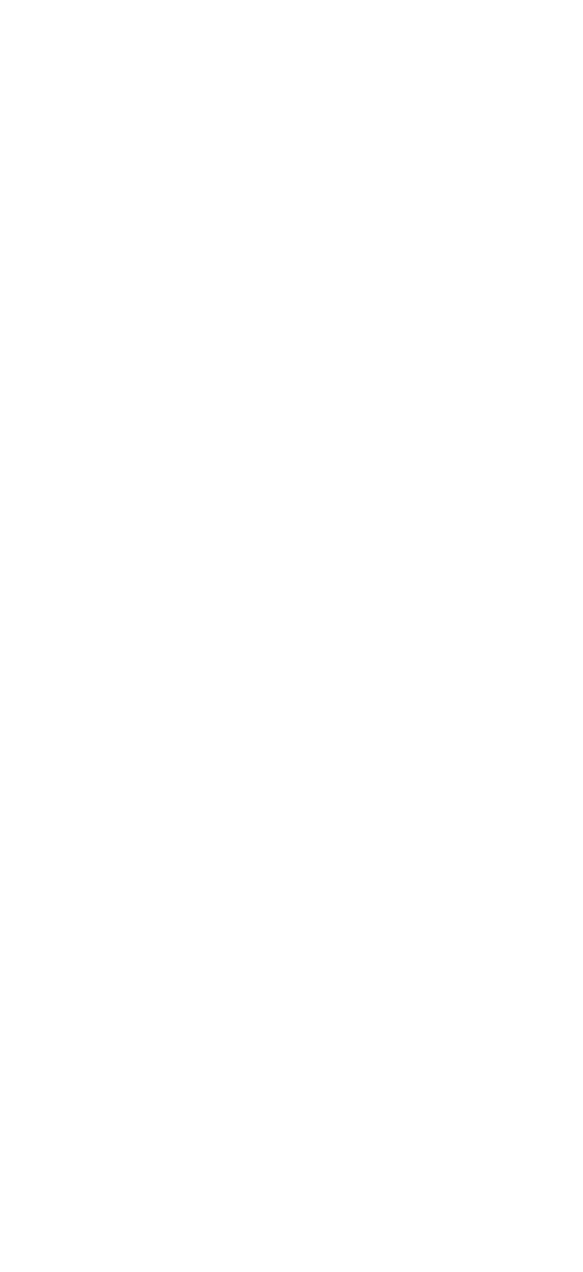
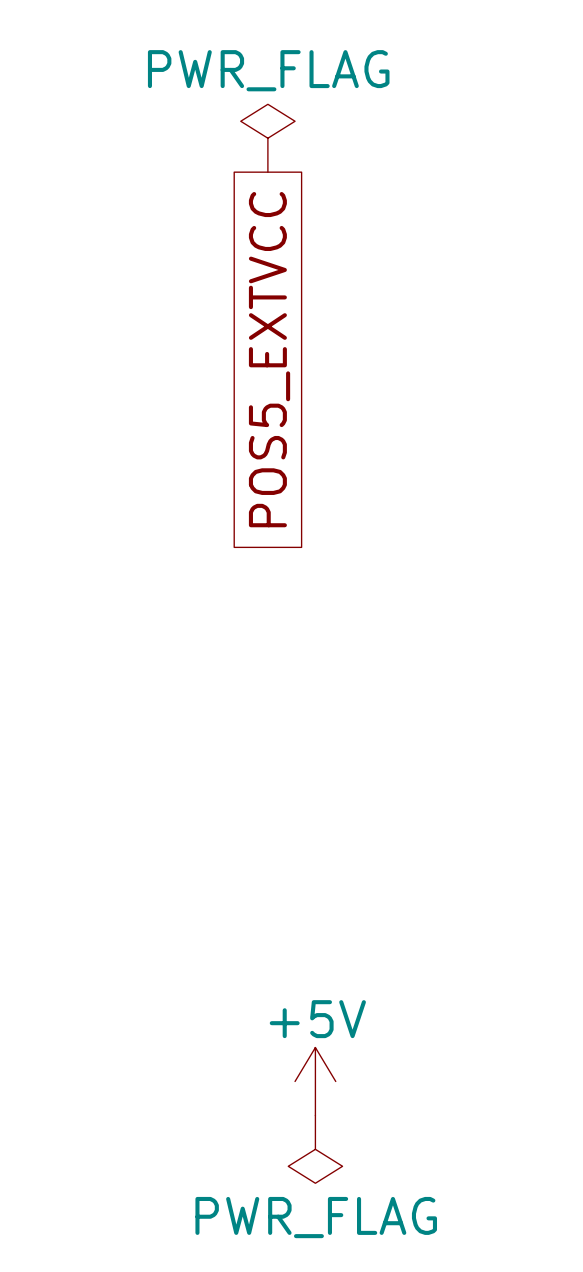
power symbol: none -> PWR_FLAG (267, 138)
global label: none -> POS5_EXTVCC (269, 359)
power symbol: none -> +5V (315, 1081)
power symbol: none -> PWR_FLAG (315, 1149)

